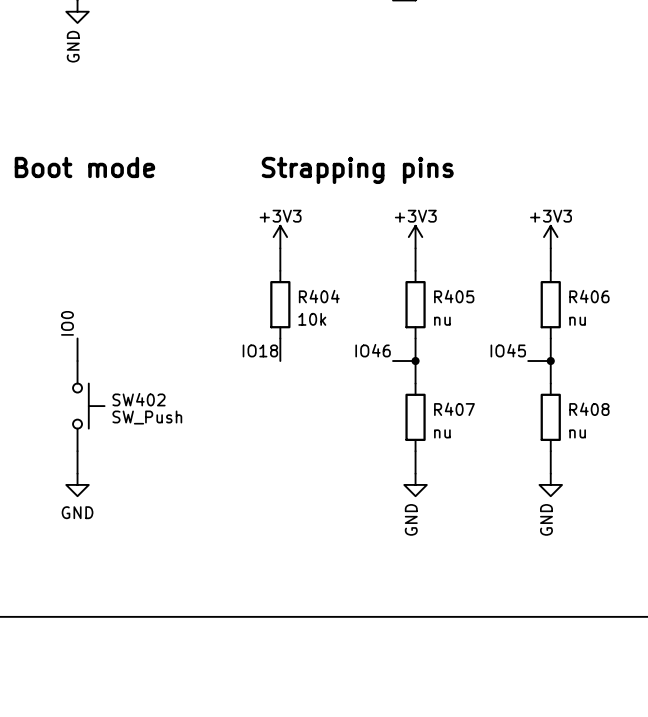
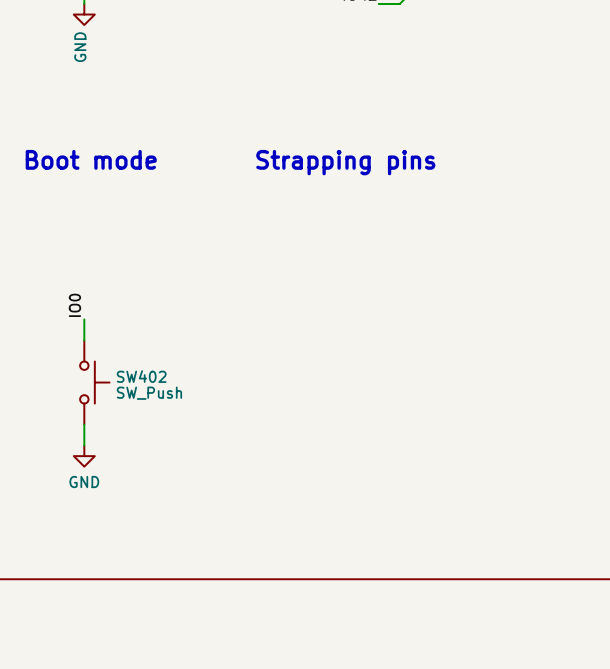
power symbol: +3V3 (280, 237) -> none
power symbol: +3V3 (415, 237) -> none
power symbol: +3V3 (550, 237) -> none
wire: (280, 248) (280, 270) -> none
wire: (415, 248) (415, 270) -> none
wire: (550, 248) (550, 270) -> none
R404: 10k (280, 304) -> none
R405: nu (415, 304) -> none
R406: nu (550, 304) -> none
wire: (280, 338) (280, 361) -> none
wire: (415, 338) (415, 383) -> none
wire: (550, 338) (550, 383) -> none
label: IO18 (260, 350) -> none
label: IO46 (373, 350) -> none
label: IO45 (508, 350) -> none
wire: (393, 361) (415, 361) -> none
junction: (415, 361) -> none
wire: (528, 361) (550, 361) -> none
junction: (550, 361) -> none
R407: nu (415, 417) -> none
R408: nu (550, 417) -> none
wire: (415, 451) (415, 473) -> none
wire: (550, 451) (550, 473) -> none
power symbol: GND (415, 484) -> none
power symbol: GND (550, 484) -> none

